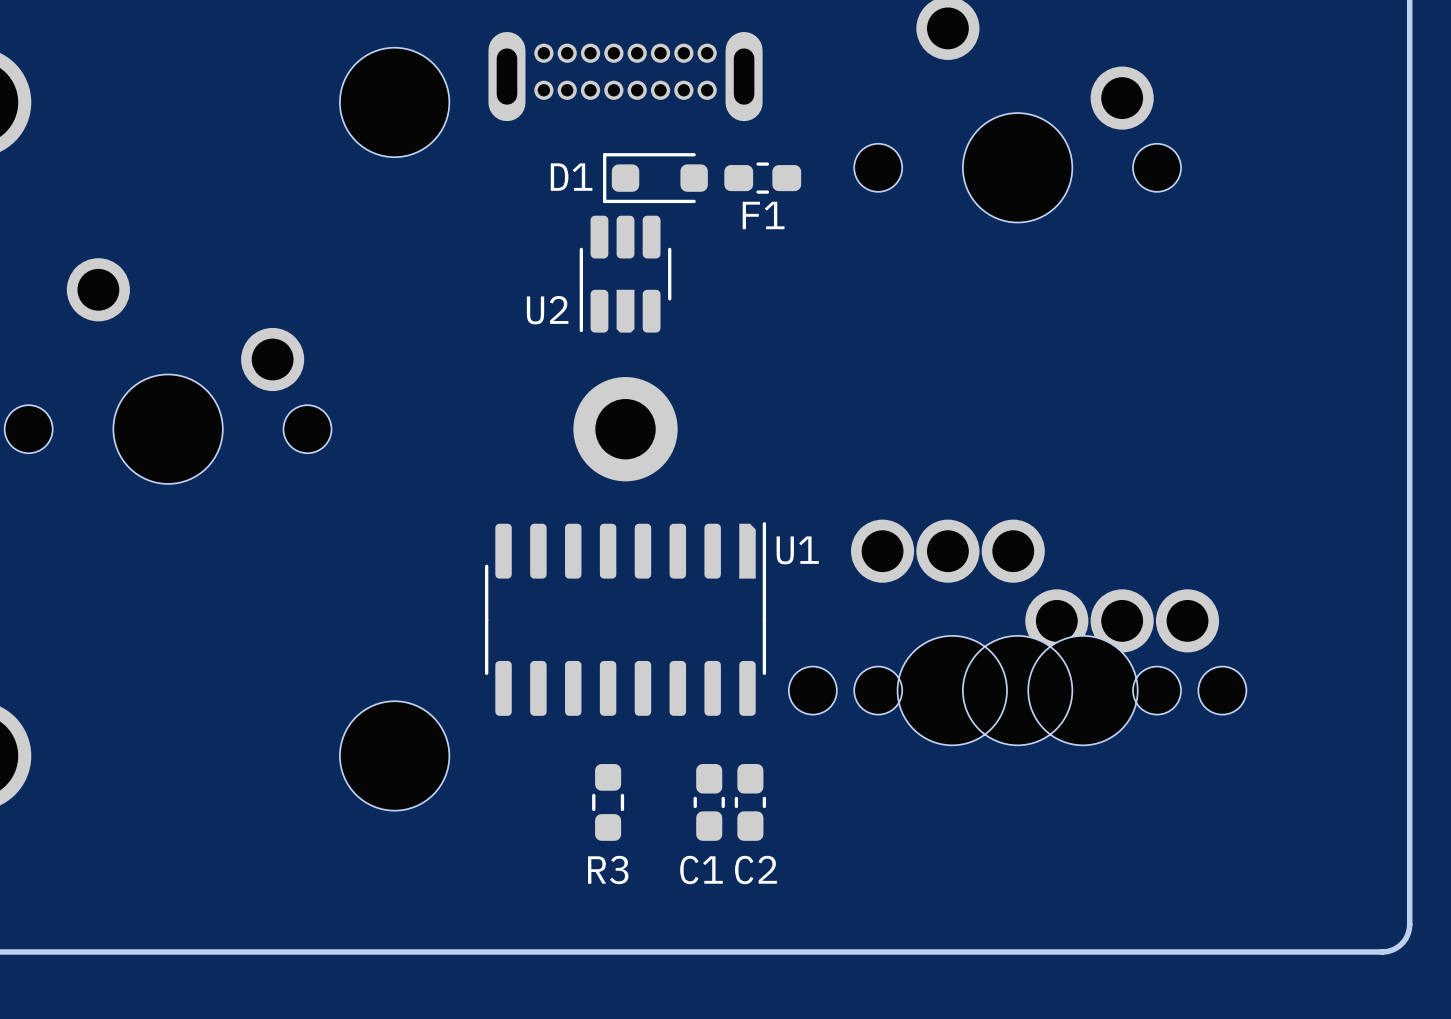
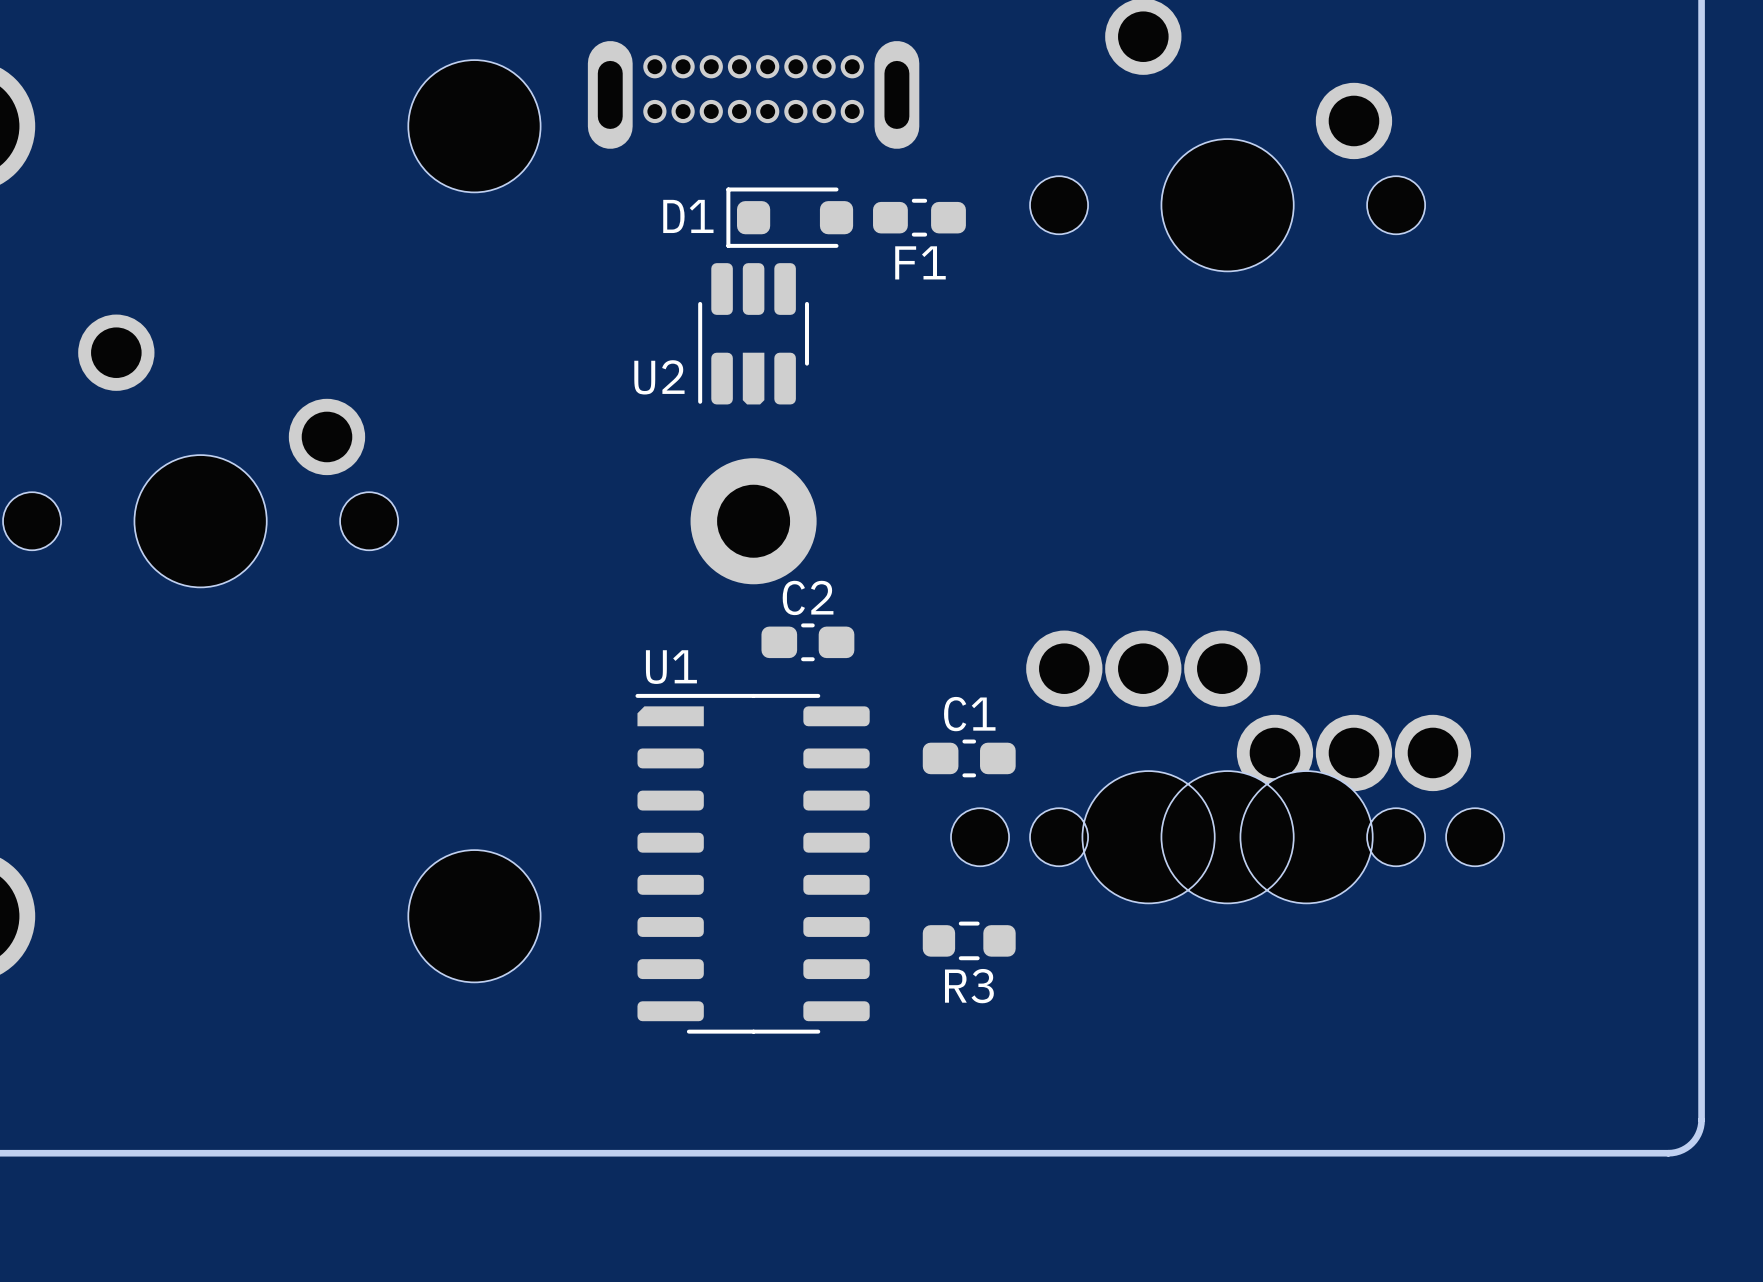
U1 rotation: 0° (625, 618) -> 90° counterclockwise (752, 863)
R3 rotation: 0° (608, 802) -> 90° clockwise (969, 940)
R3 position: (608, 802) -> (969, 940)
C1 rotation: 0° (709, 802) -> 90° clockwise (969, 758)
C1 position: (709, 802) -> (969, 758)
C2 rotation: 0° (750, 802) -> 90° clockwise (807, 642)
C2 position: (750, 802) -> (807, 642)
C1 name position: C1 (701, 870) -> C1 (969, 714)
C2 name position: C2 (756, 870) -> C2 (808, 597)

